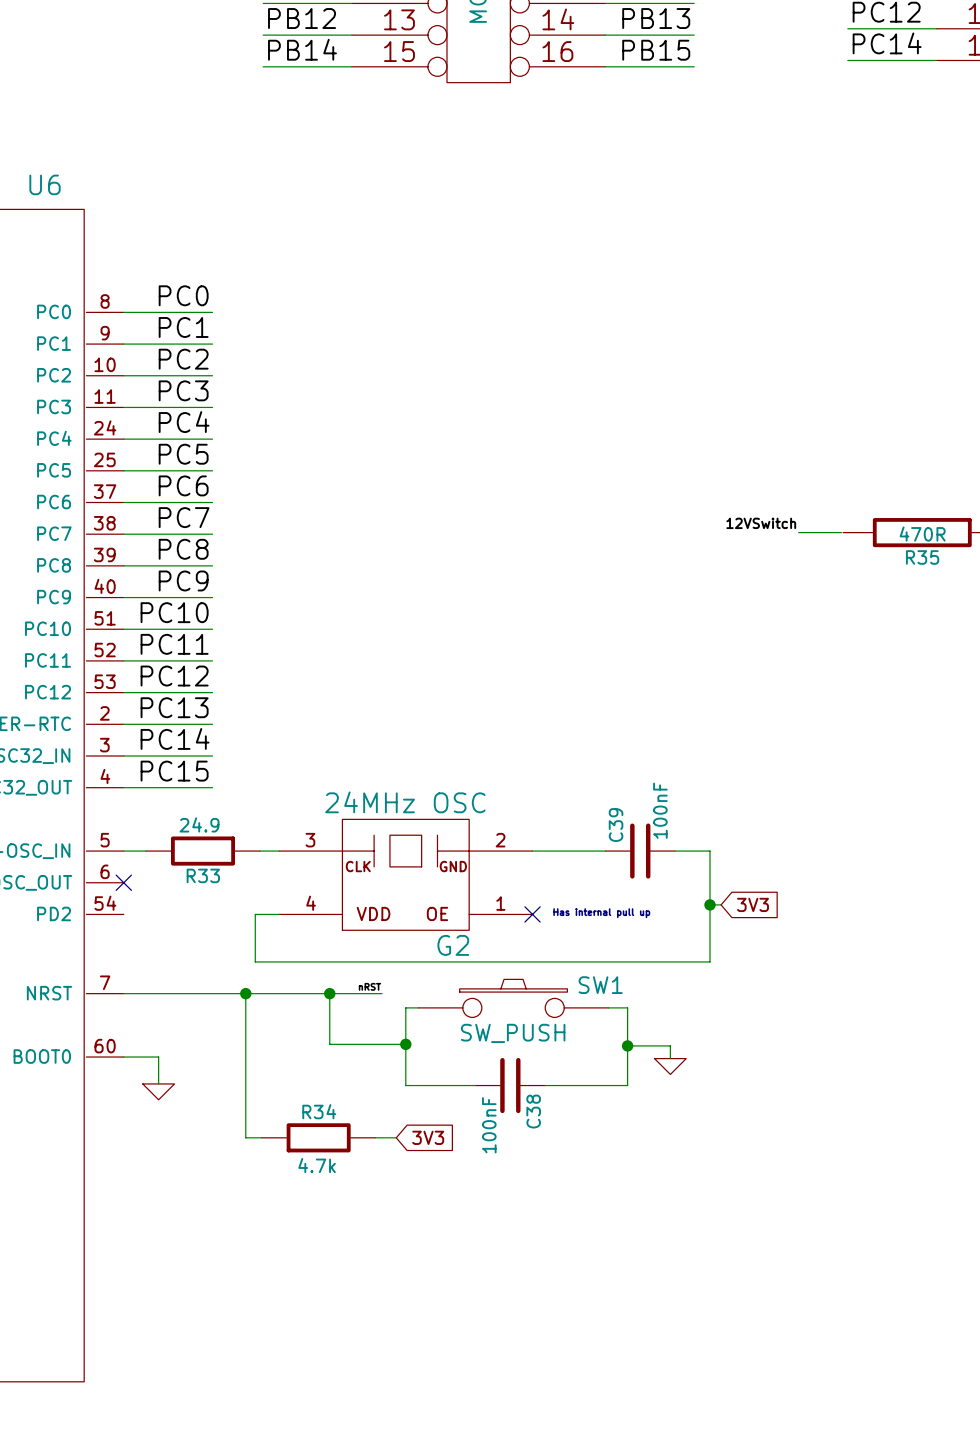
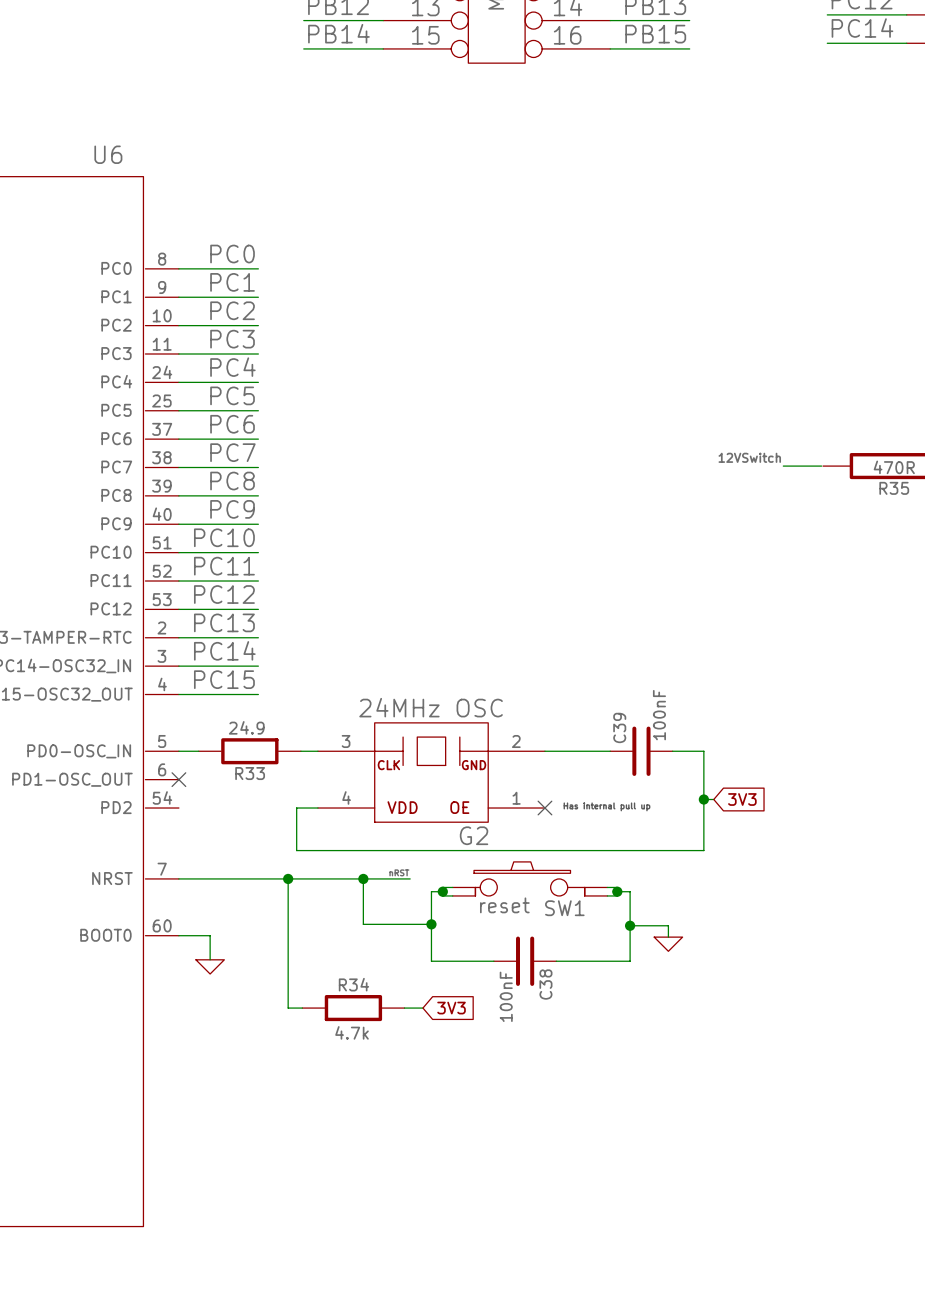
SW1 symbol: [418, 979, 609, 1018] -> [452, 861, 608, 896]
SW1 name position: SW1 (600, 985) -> SW1 (564, 908)
wire: none -> (452, 887) (442, 887) (442, 895) (452, 895)
wire: none -> (607, 887) (617, 887) (617, 895) (607, 895)
junction: none -> (442, 891)
junction: none -> (617, 891)
SW1 value: SW_PUSH (513, 1033) -> reset (504, 905)

